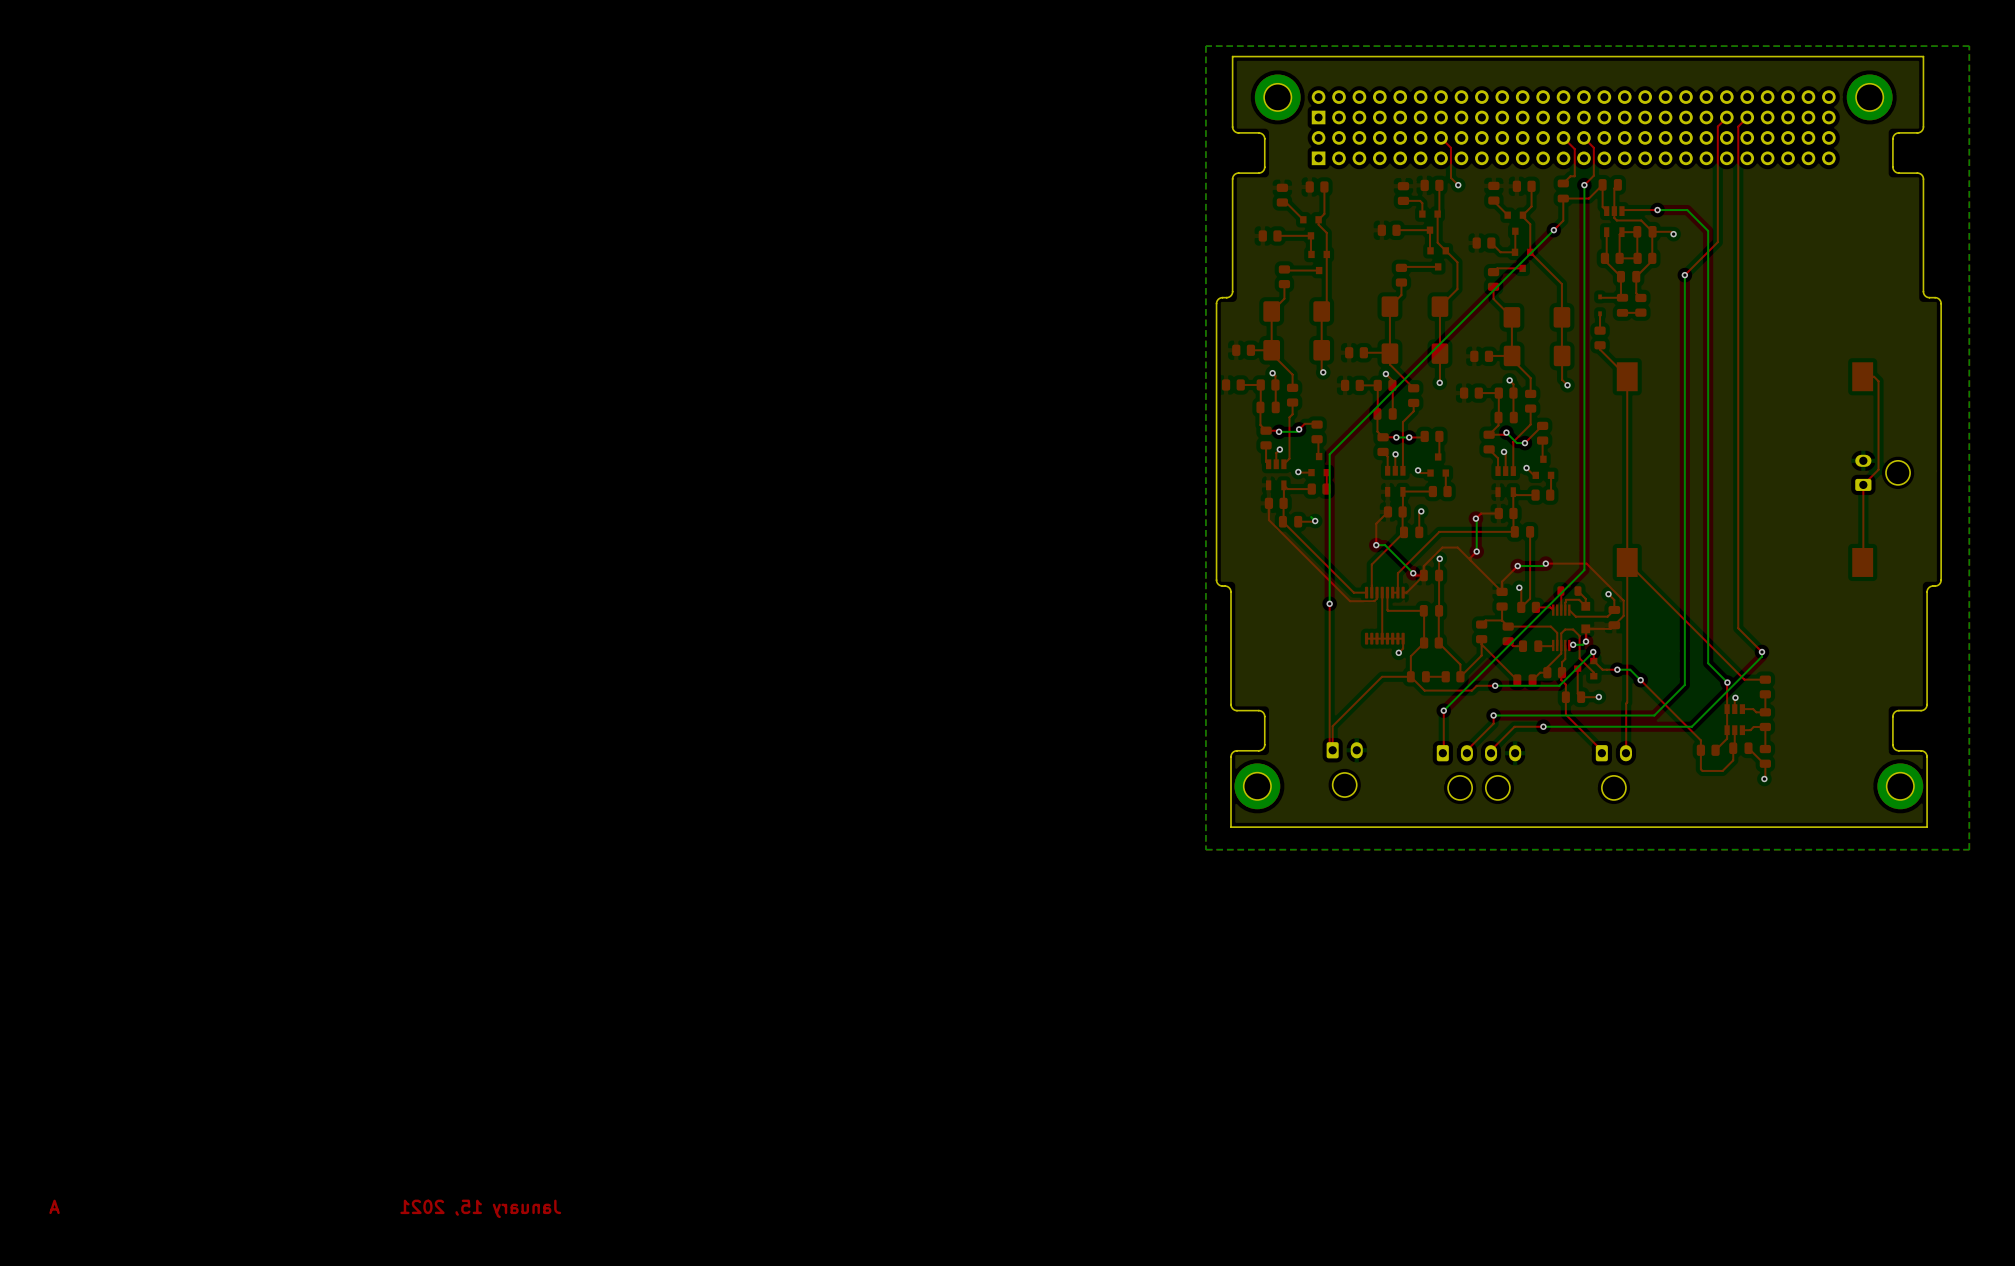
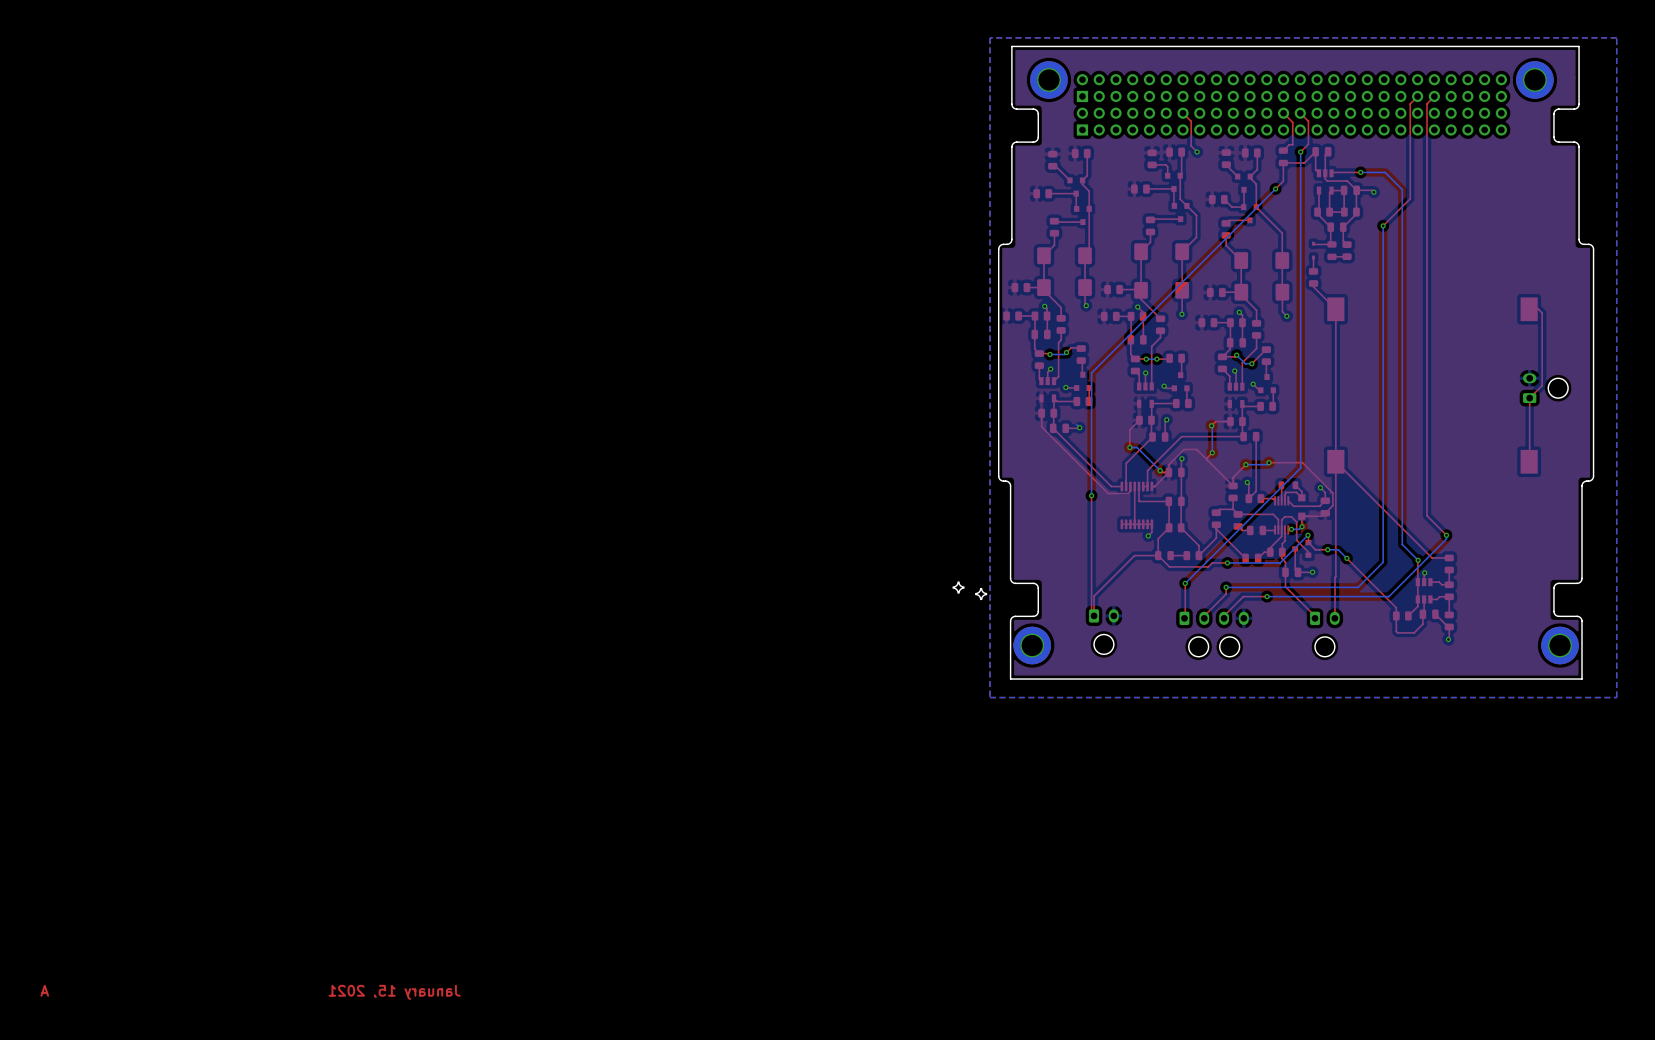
board edge: none -> (958, 582) (953, 587)
board edge: none -> (958, 582) (963, 587)
board edge: none -> (953, 588) (958, 593)
board edge: none -> (964, 588) (959, 593)
board edge: none -> (980, 588) (975, 593)
board edge: none -> (981, 588) (986, 593)
board edge: none -> (975, 594) (980, 599)
board edge: none -> (986, 594) (981, 599)

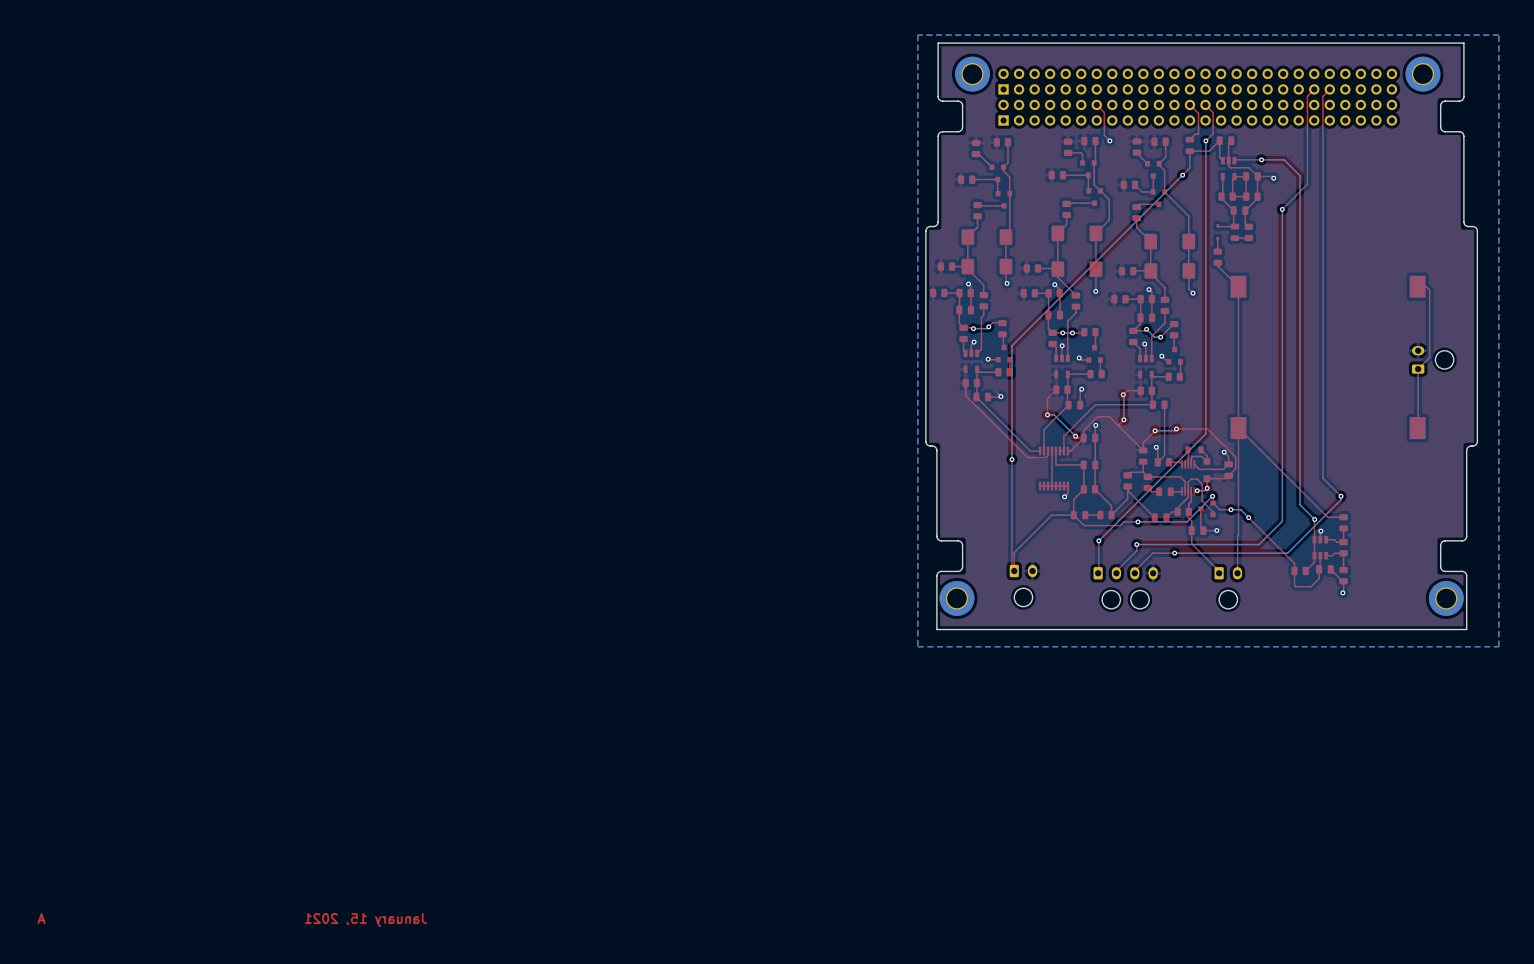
board edge: (958, 582) (963, 587) -> none
board edge: (958, 582) (953, 587) -> none
board edge: (953, 588) (958, 593) -> none
board edge: (964, 588) (959, 593) -> none
board edge: (980, 588) (975, 593) -> none
board edge: (981, 588) (986, 593) -> none
board edge: (975, 594) (980, 599) -> none
board edge: (986, 594) (981, 599) -> none

